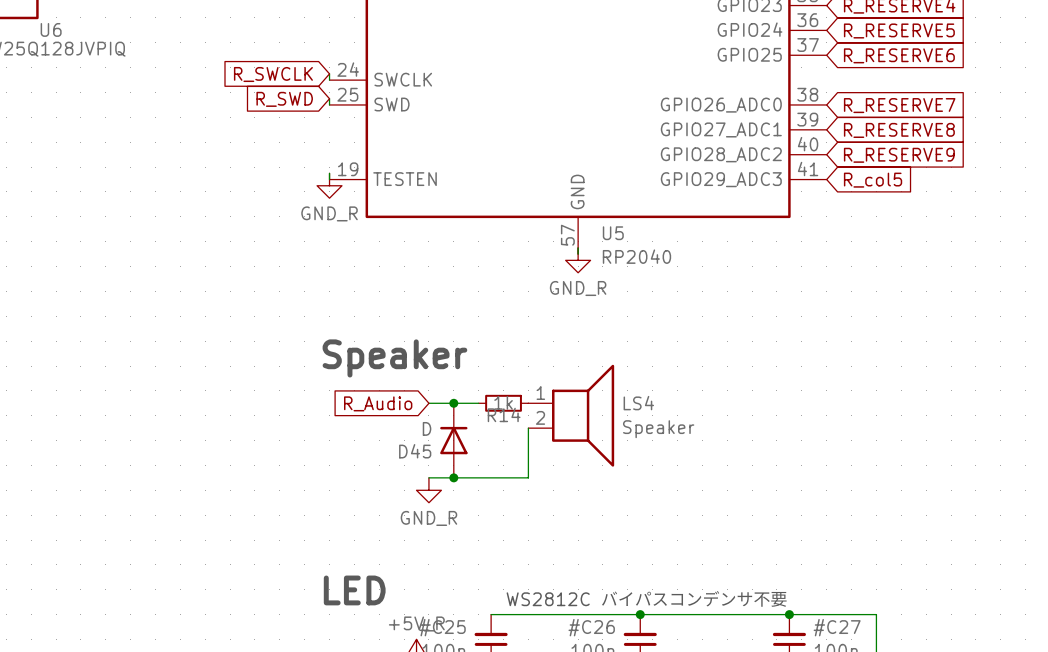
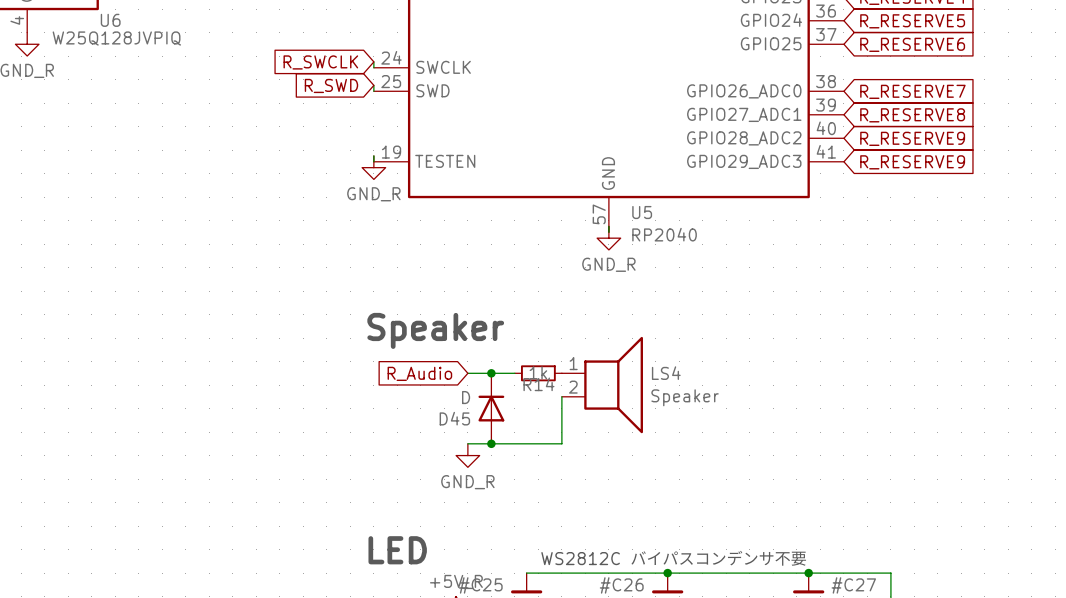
global label: R_col5 (873, 180) -> R_RESERVE9 (912, 162)

